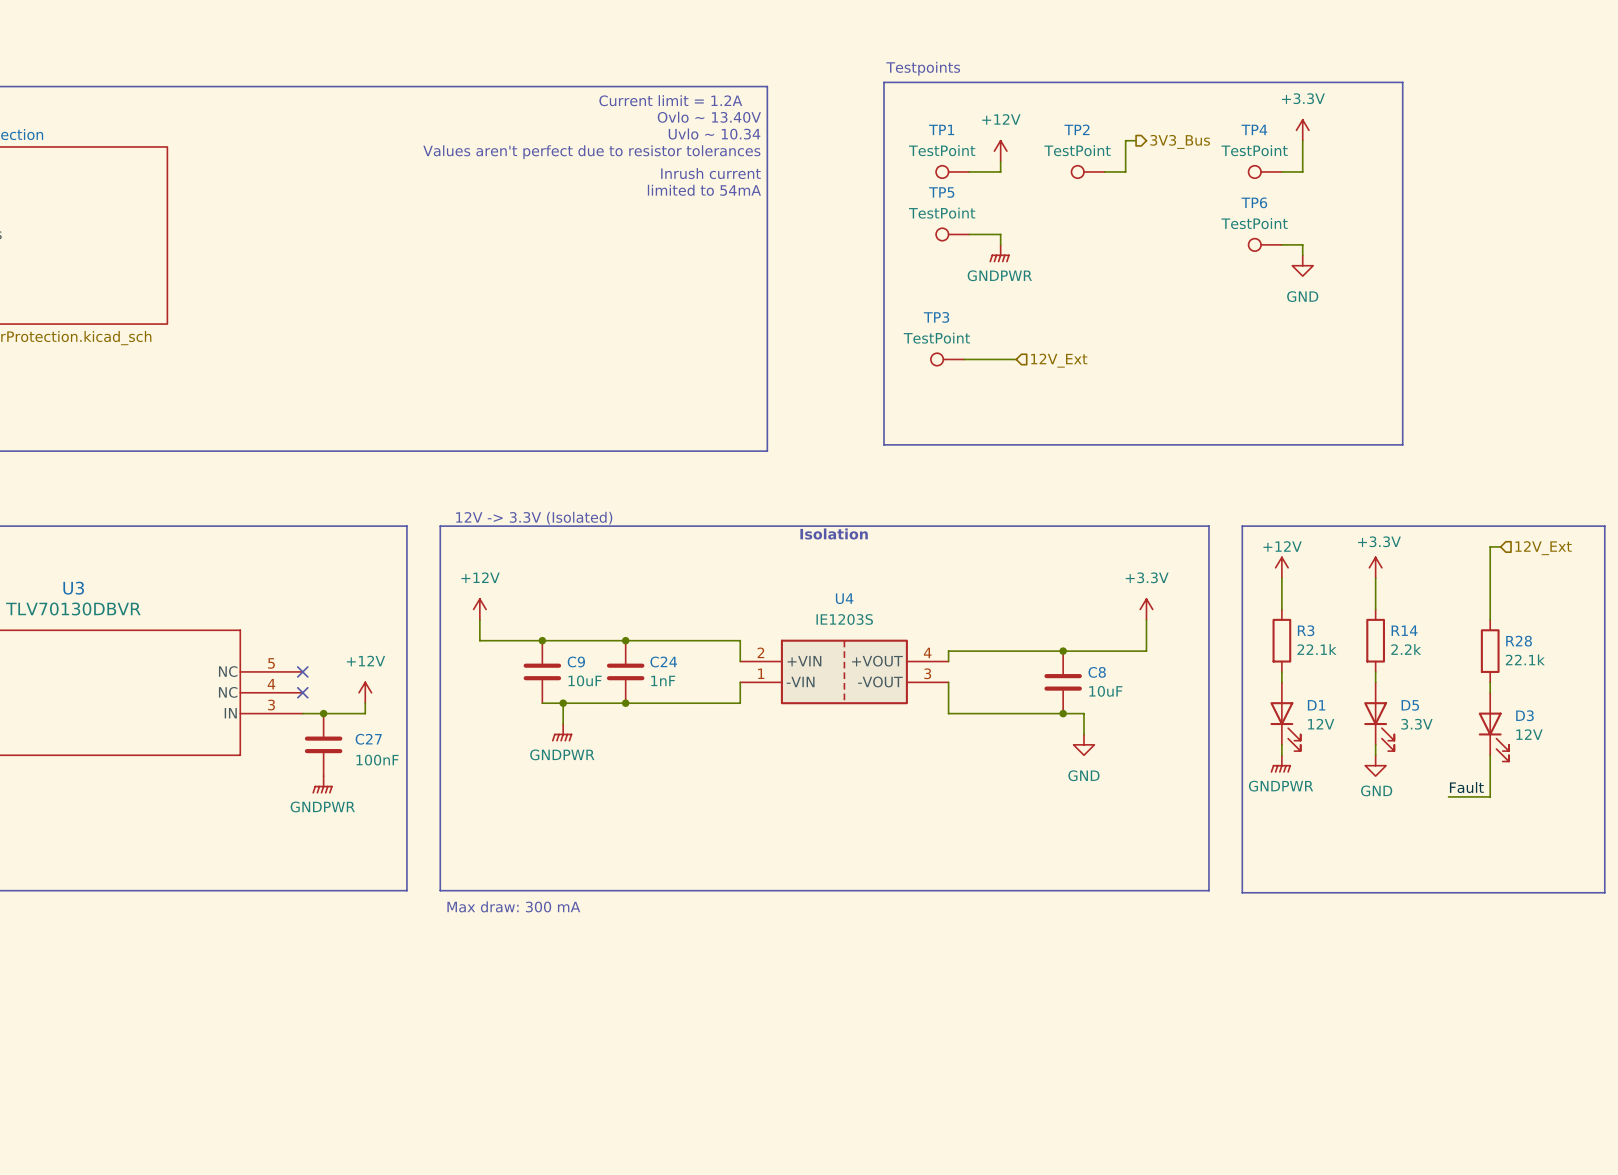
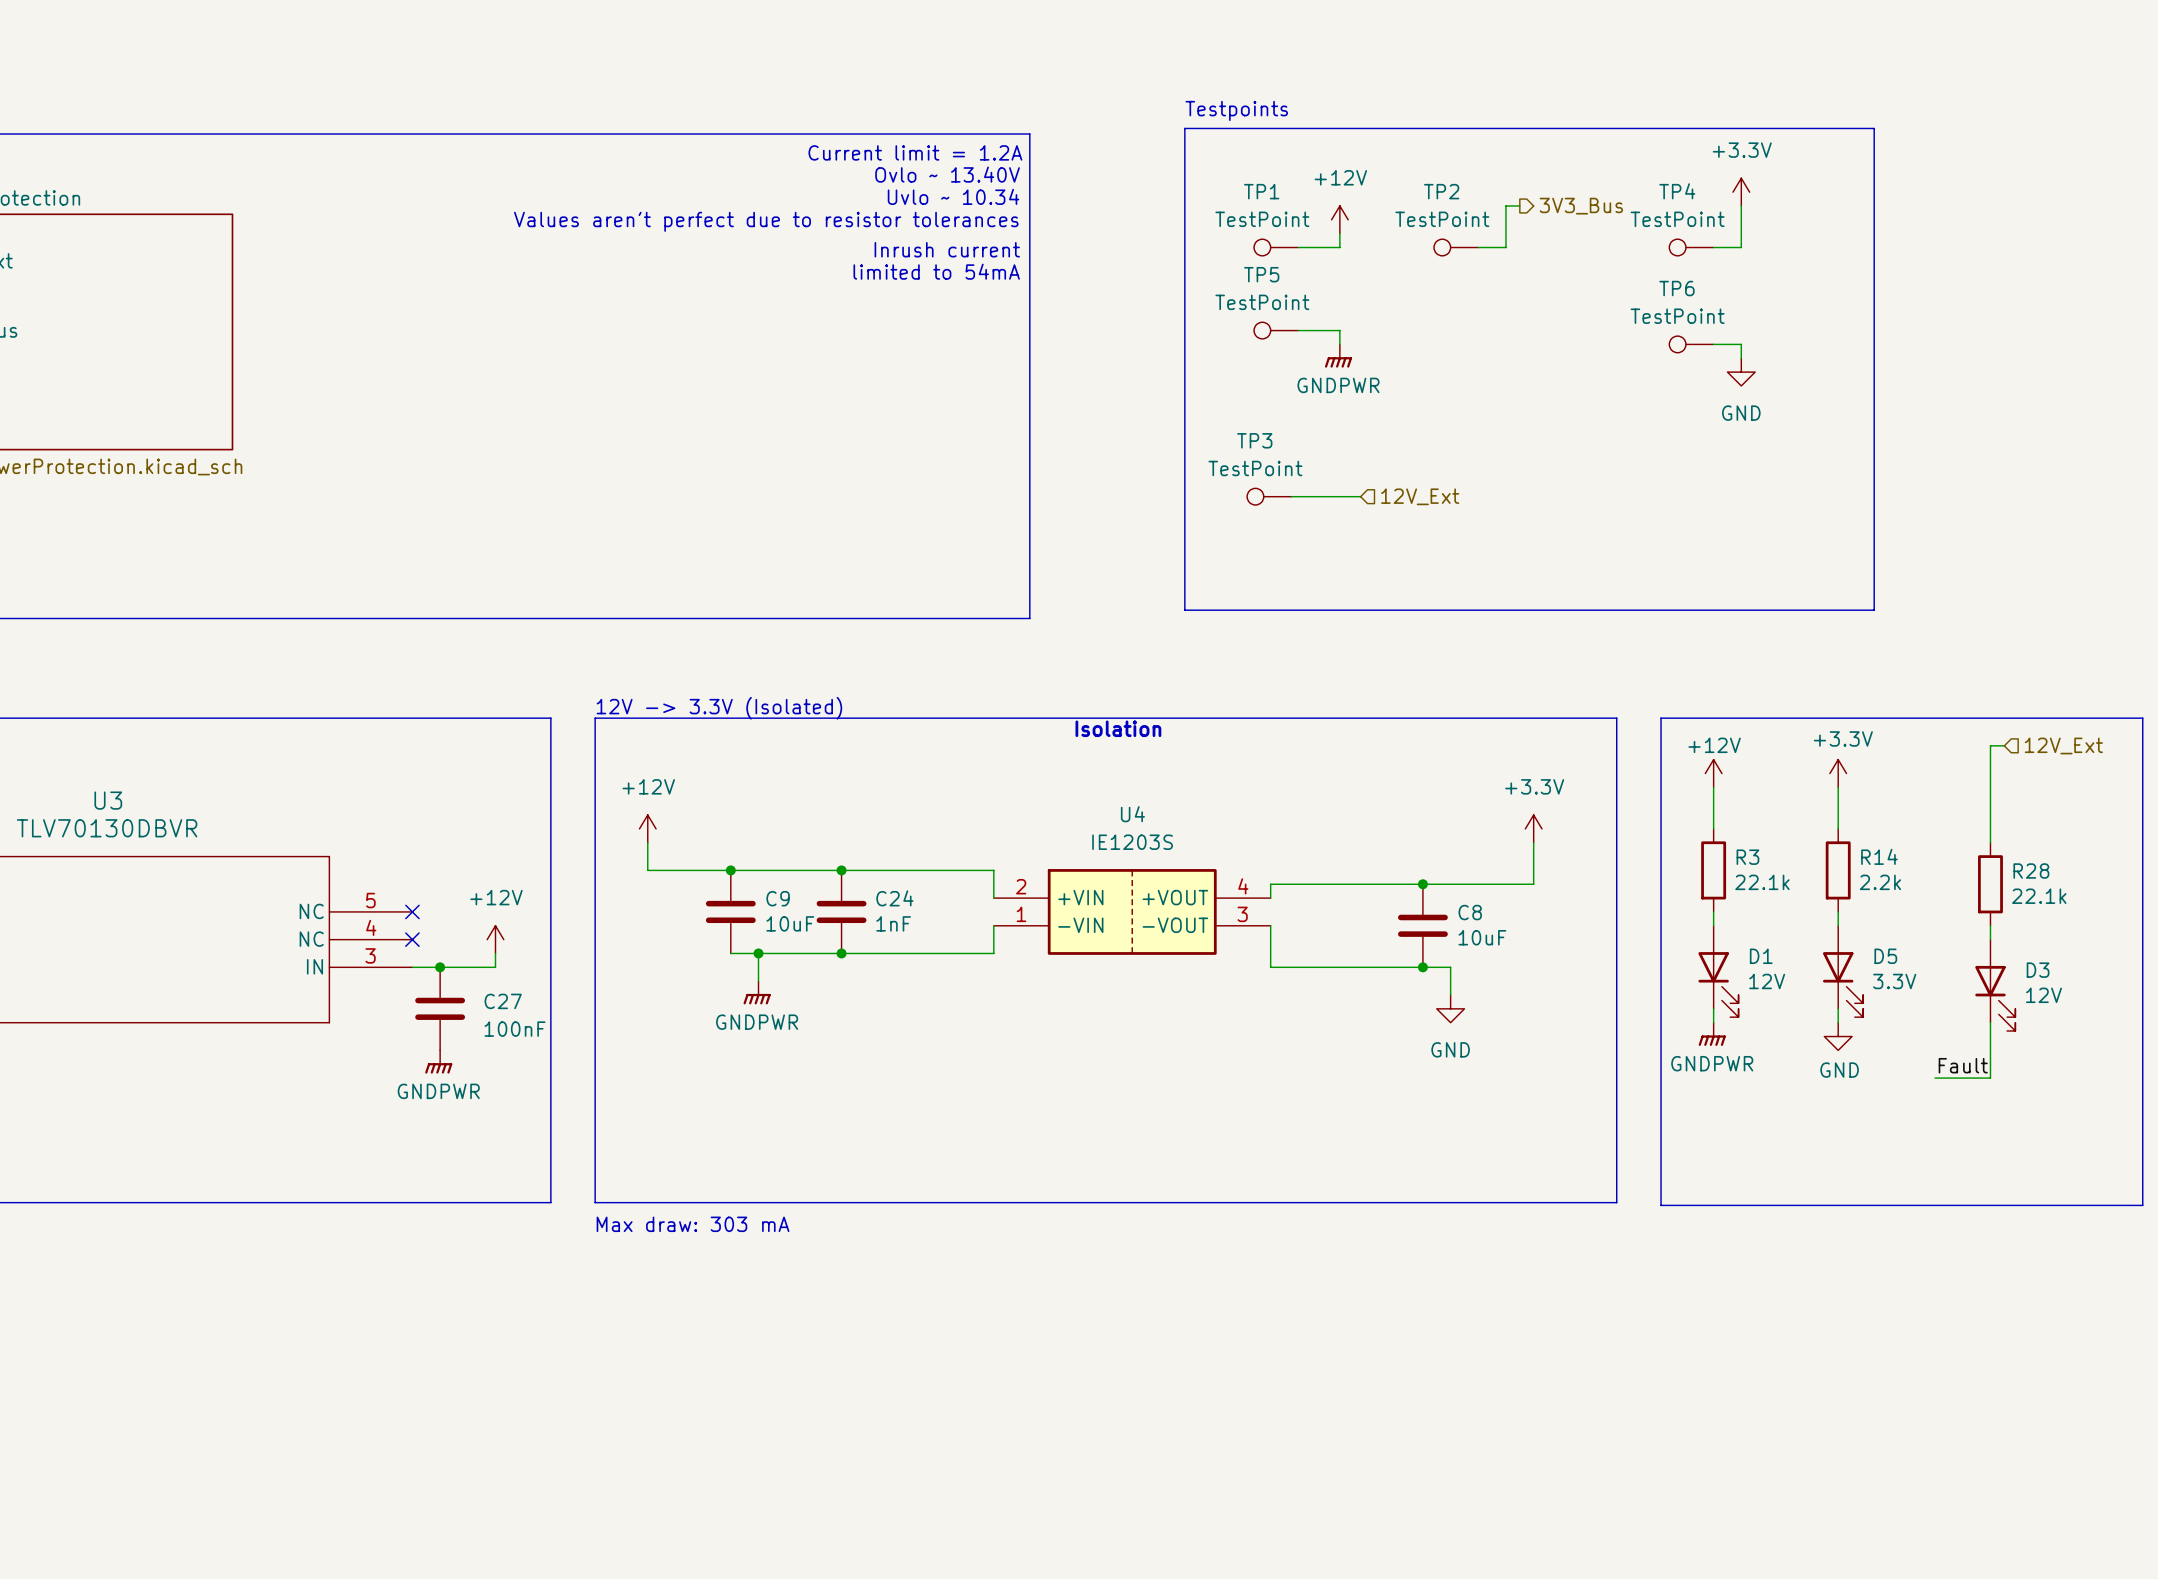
text: Max draw: 300 mA (513, 906) -> Max draw: 303 mA (693, 1224)

